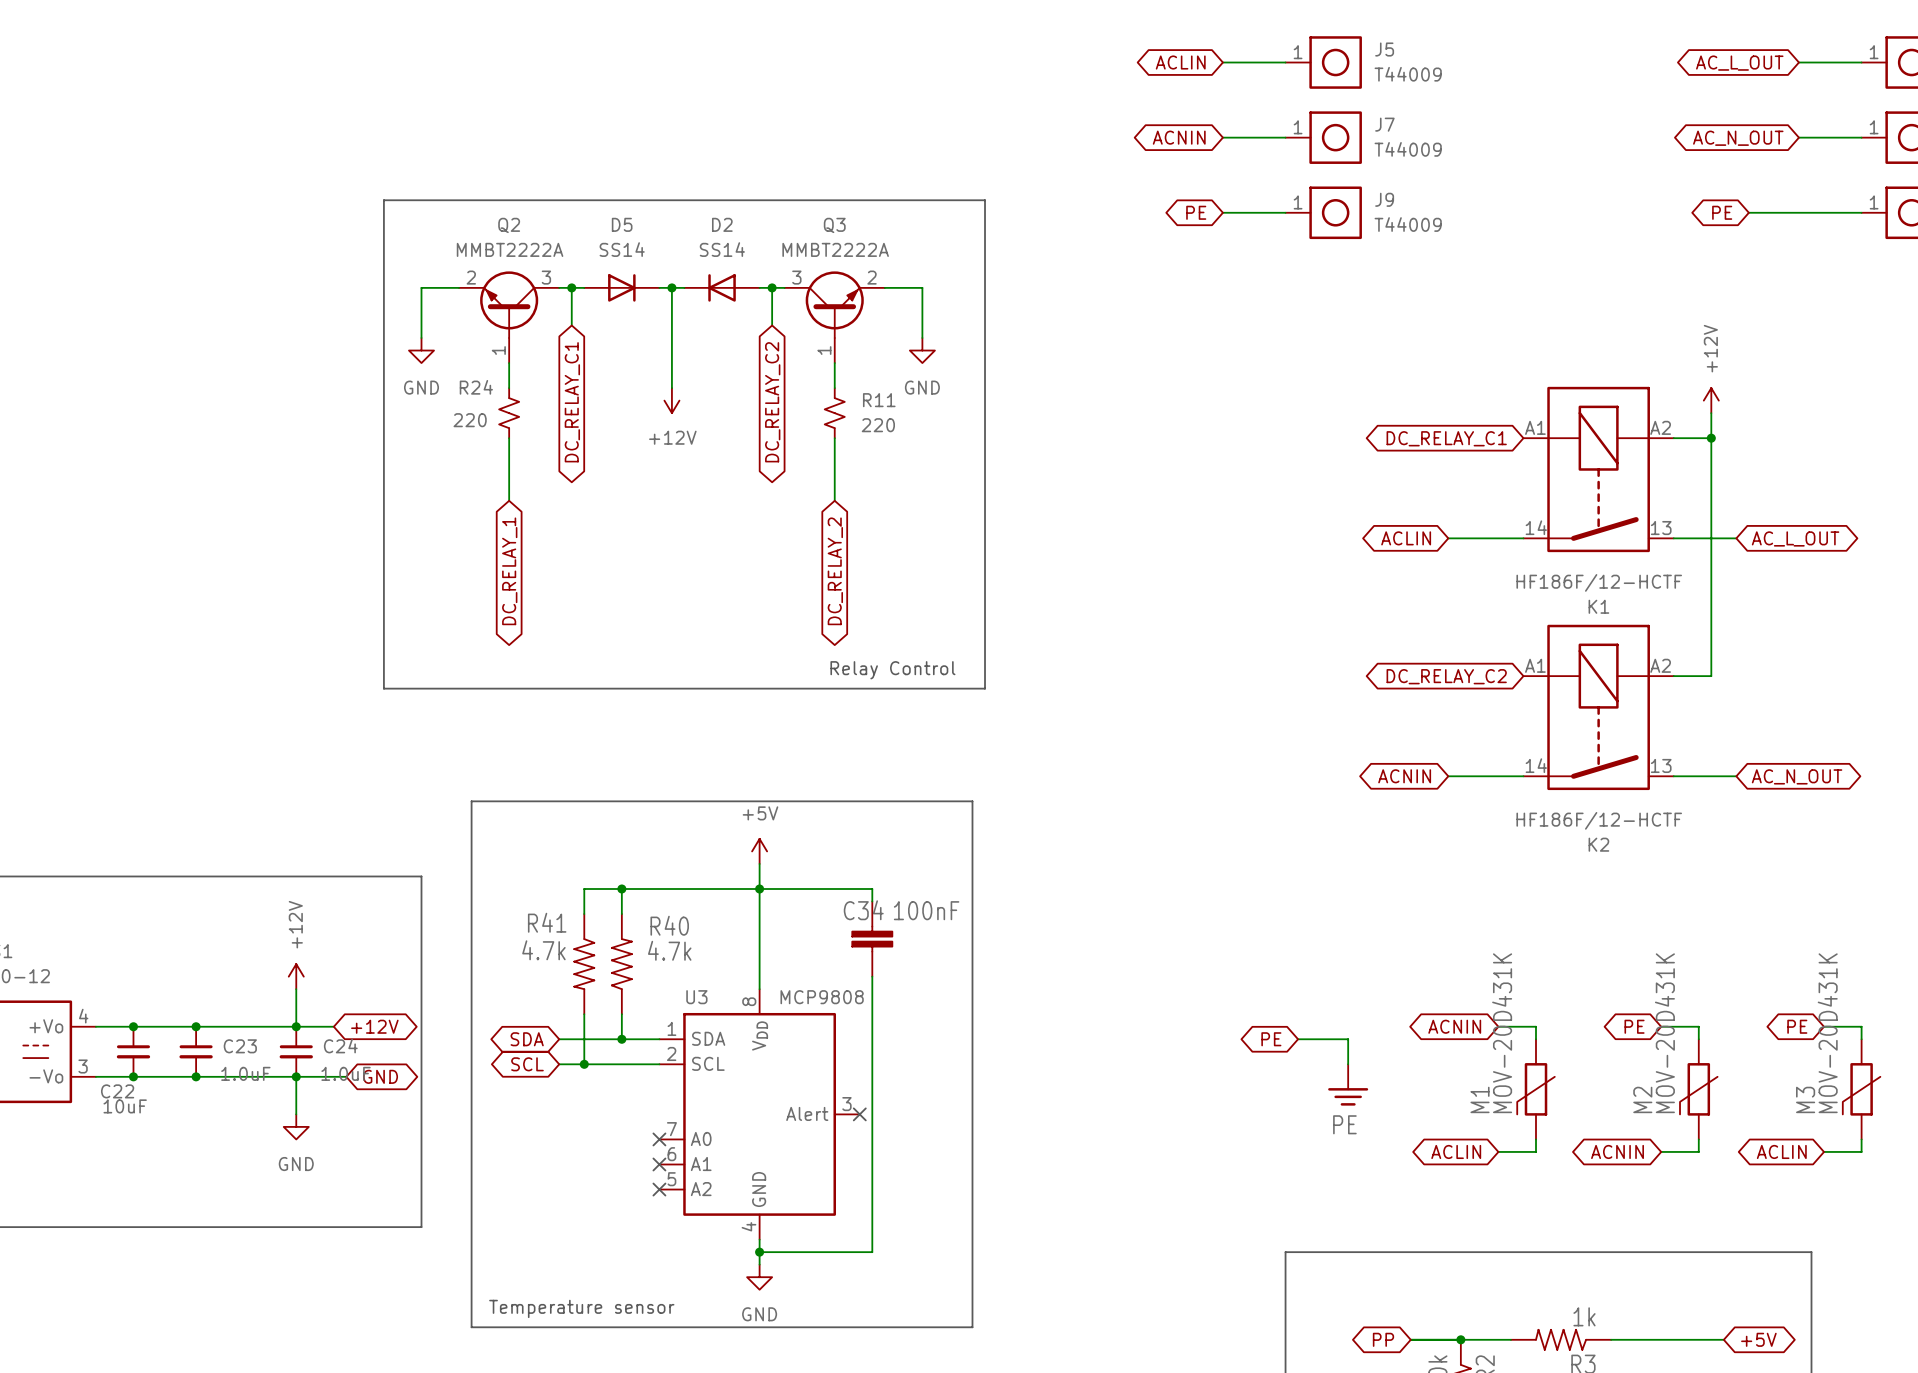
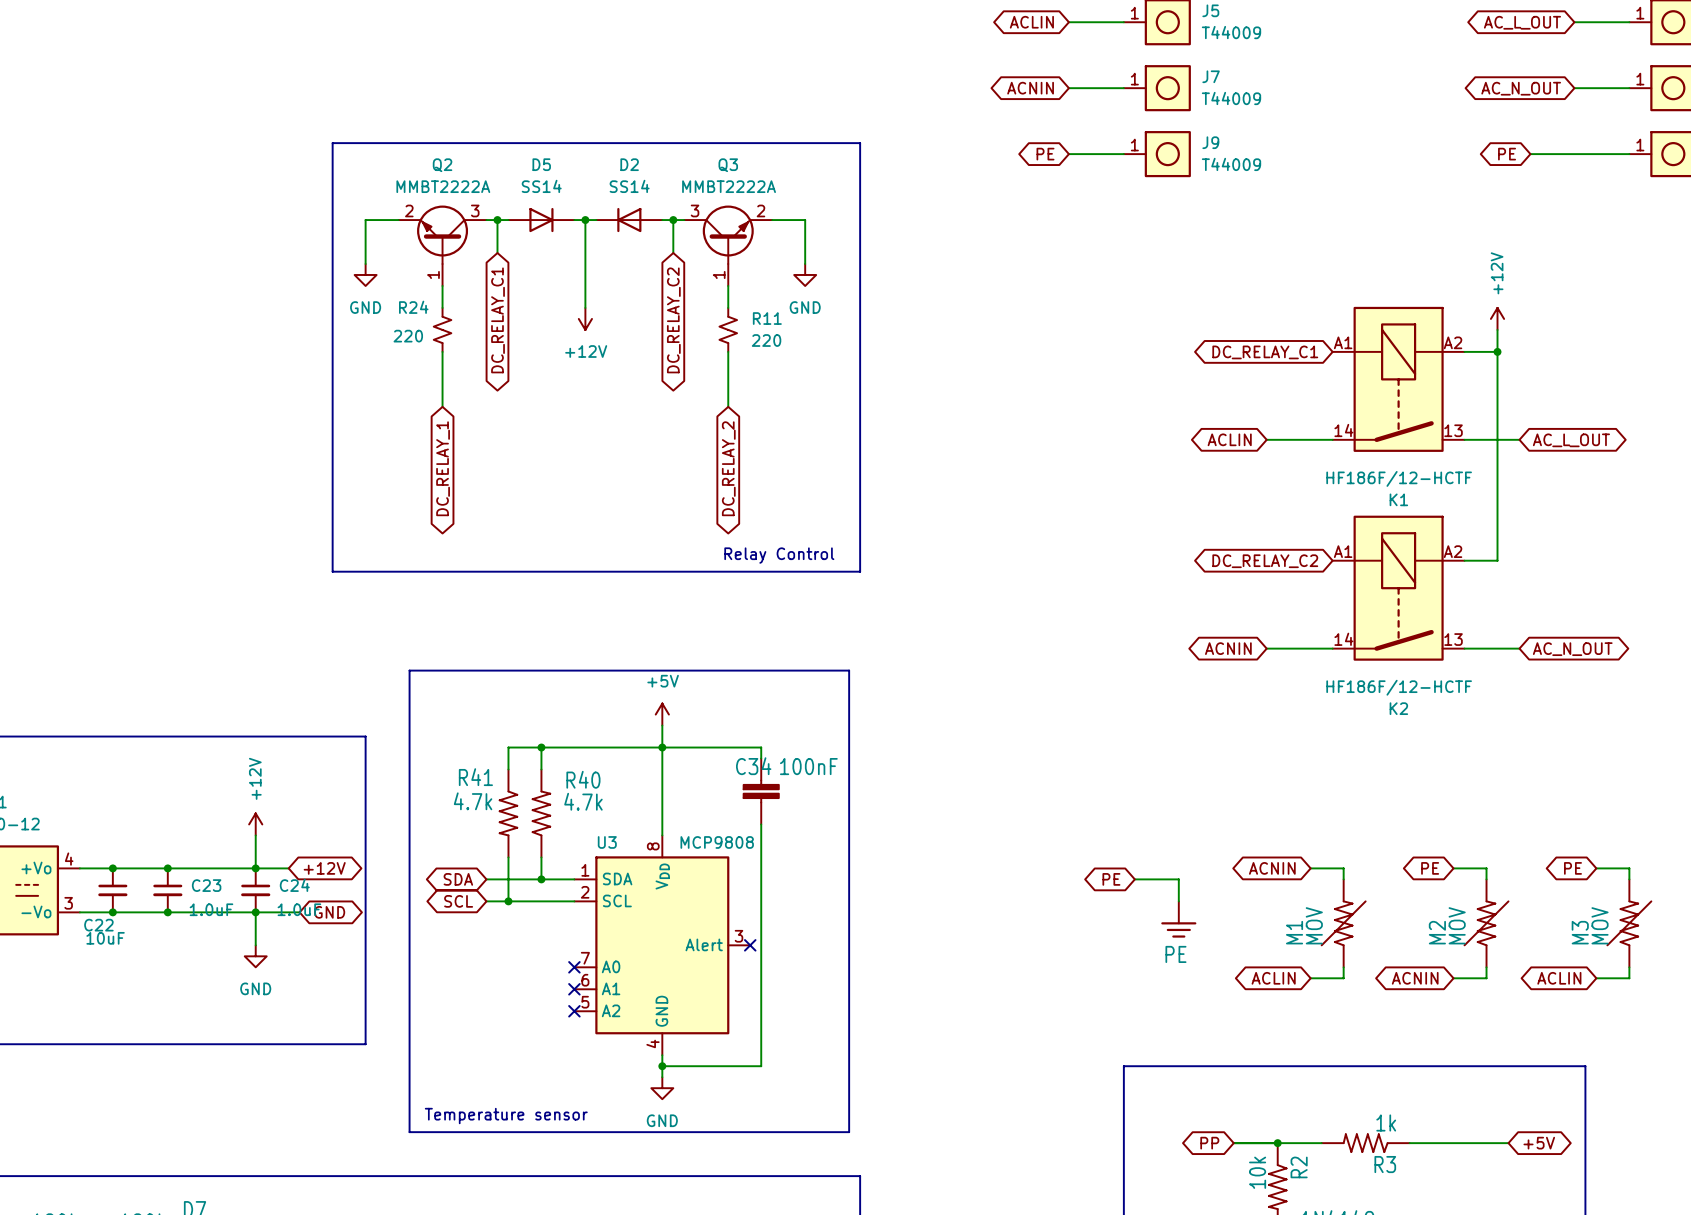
M1 value: MOV-20D431K (1502, 1033) -> MOV (1314, 925)
M2 value: MOV-20D431K (1664, 1033) -> MOV (1457, 925)
M3 value: MOV-20D431K (1827, 1033) -> MOV (1600, 925)
M1 symbol: [1517, 1039, 1555, 1140] -> [1321, 879, 1367, 968]
M2 symbol: [1680, 1039, 1718, 1140] -> [1463, 879, 1510, 968]
M3 symbol: [1842, 1039, 1881, 1140] -> [1606, 879, 1653, 968]

